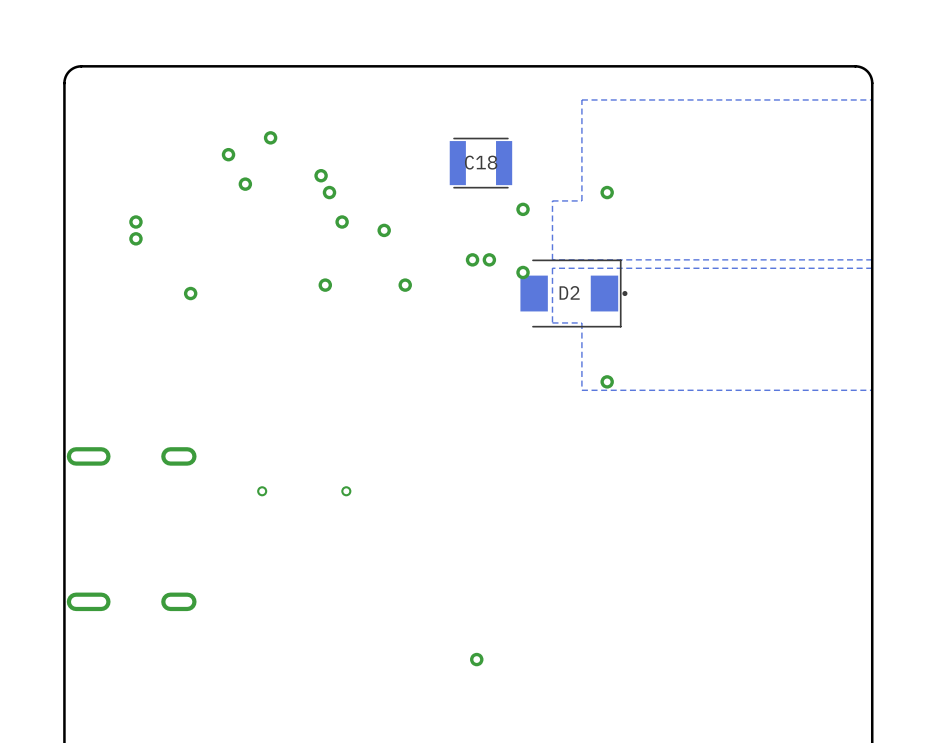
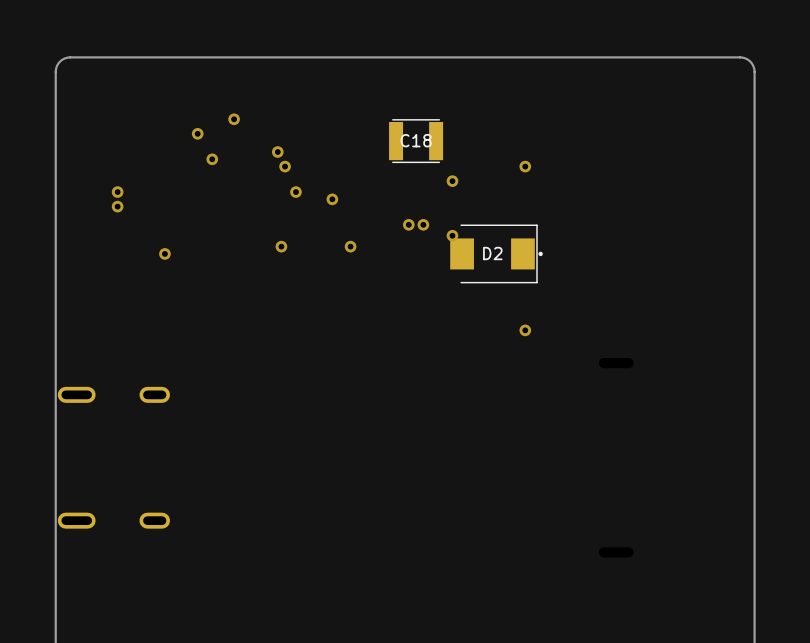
zone outline: (872, 99) (872, 259) (552, 259) (552, 200) (581, 200) (581, 99) (872, 99) -> none
zone outline: (872, 268) (552, 268) (552, 322) (581, 322) (581, 390) (872, 390) (872, 268) -> none
via: (262, 491) -> none
via: (346, 491) -> none
via: (476, 659) -> none

